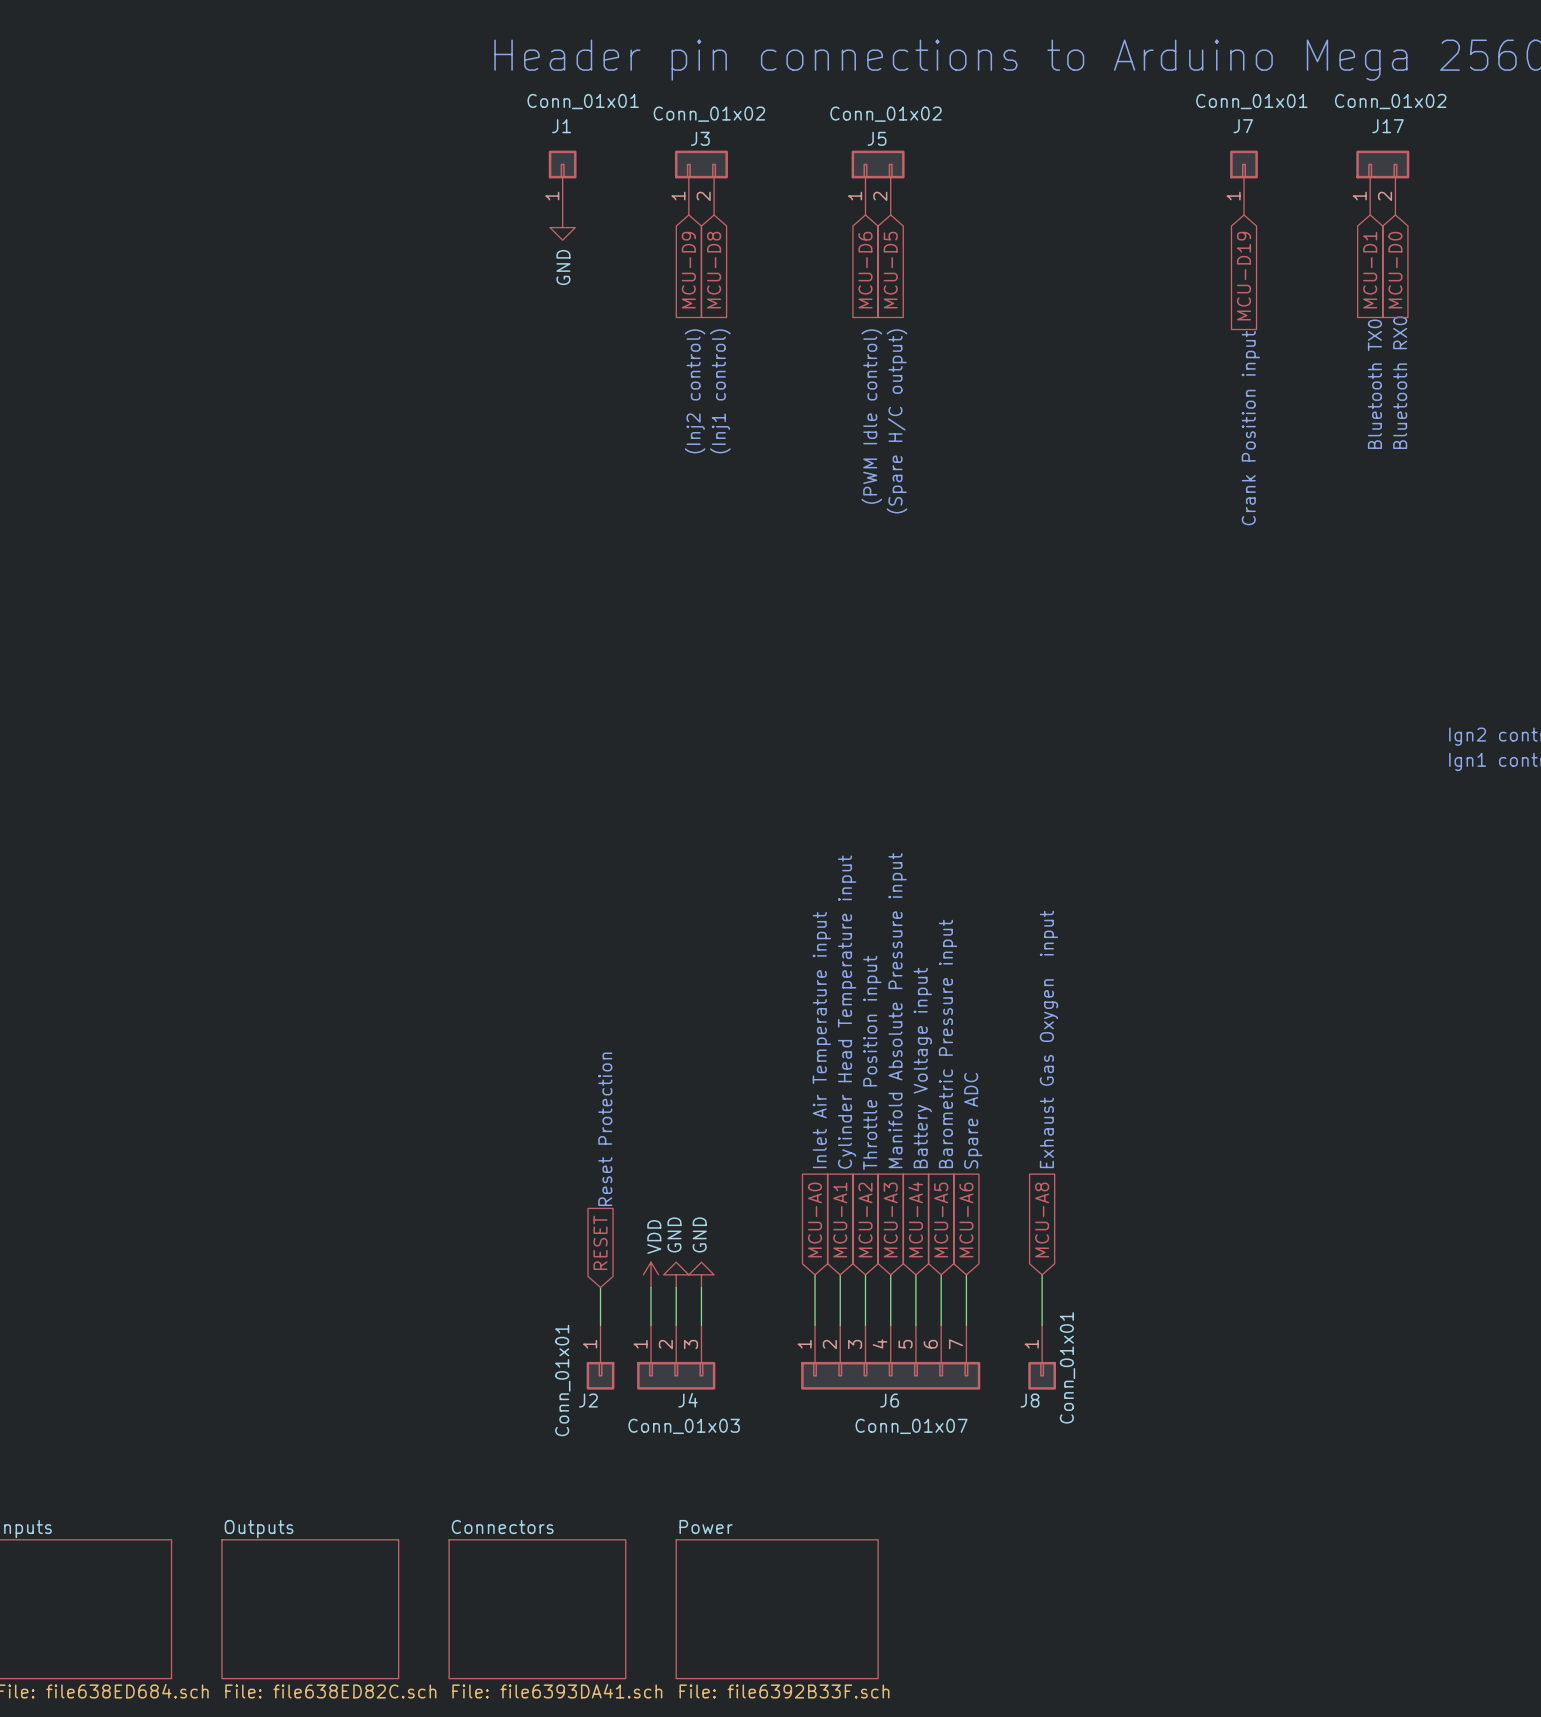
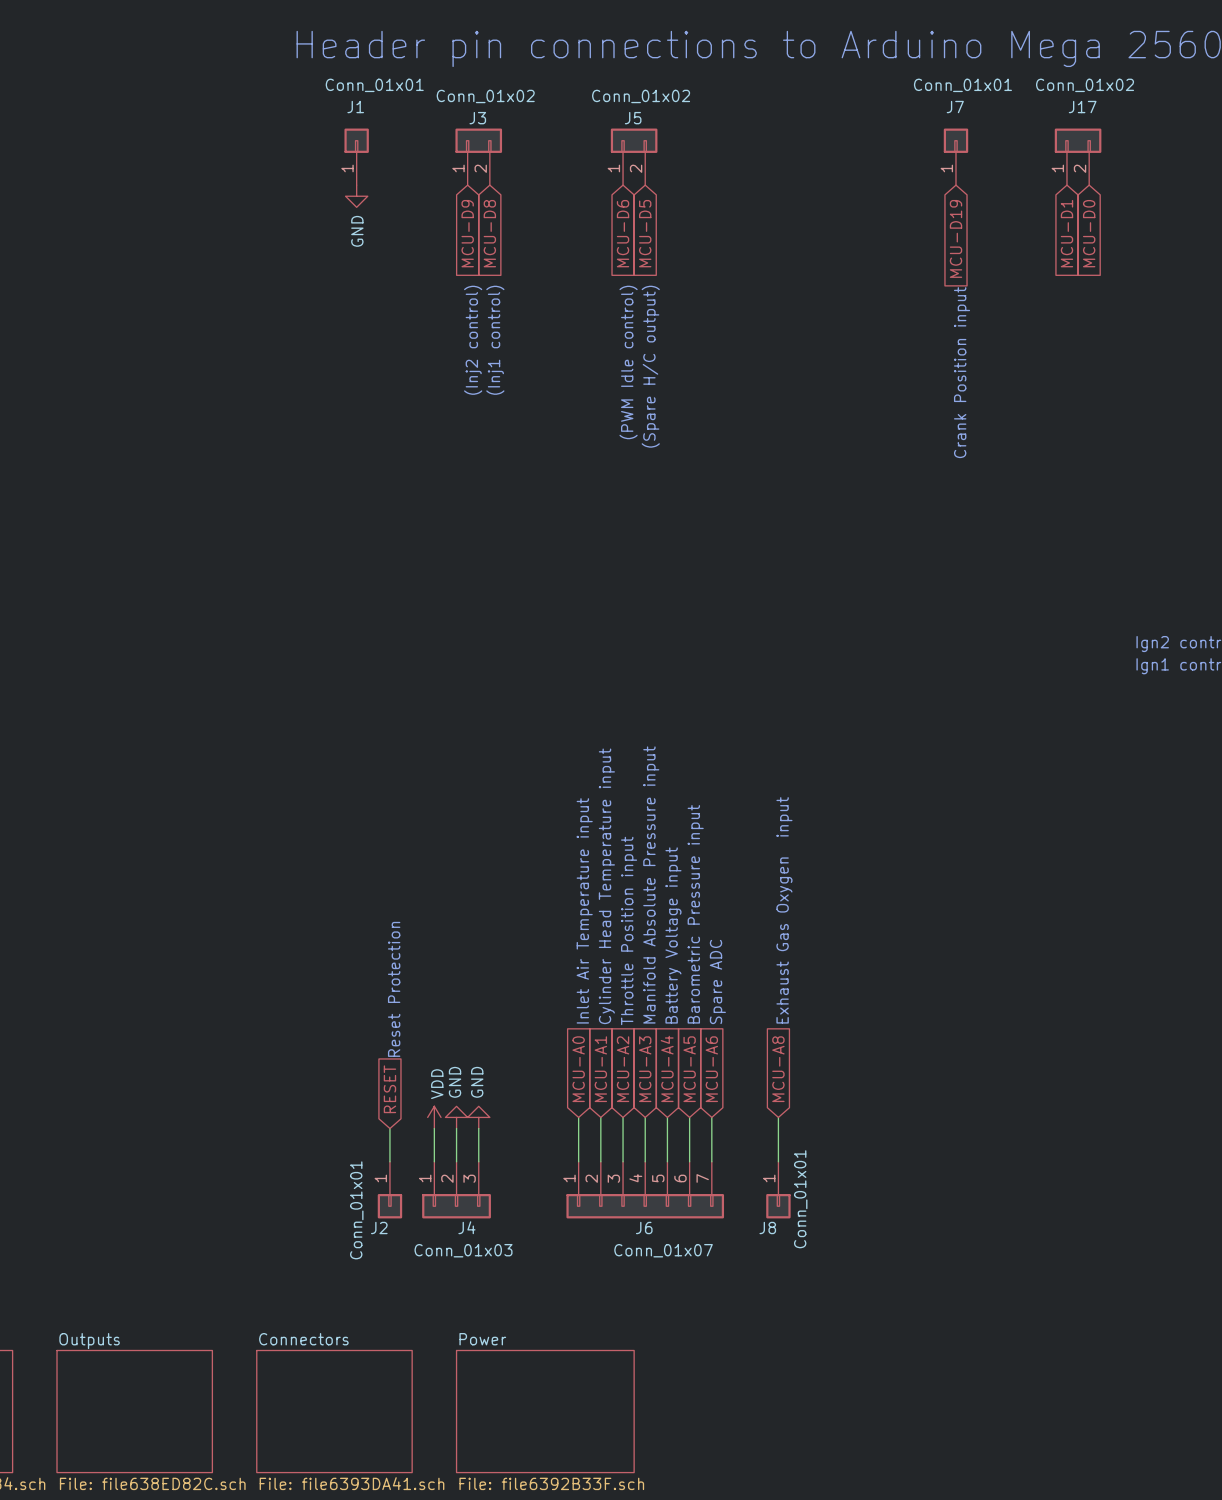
text: Bluetooth RX0 (1400, 382) -> none
text: Bluetooth TX0 (1374, 384) -> none

